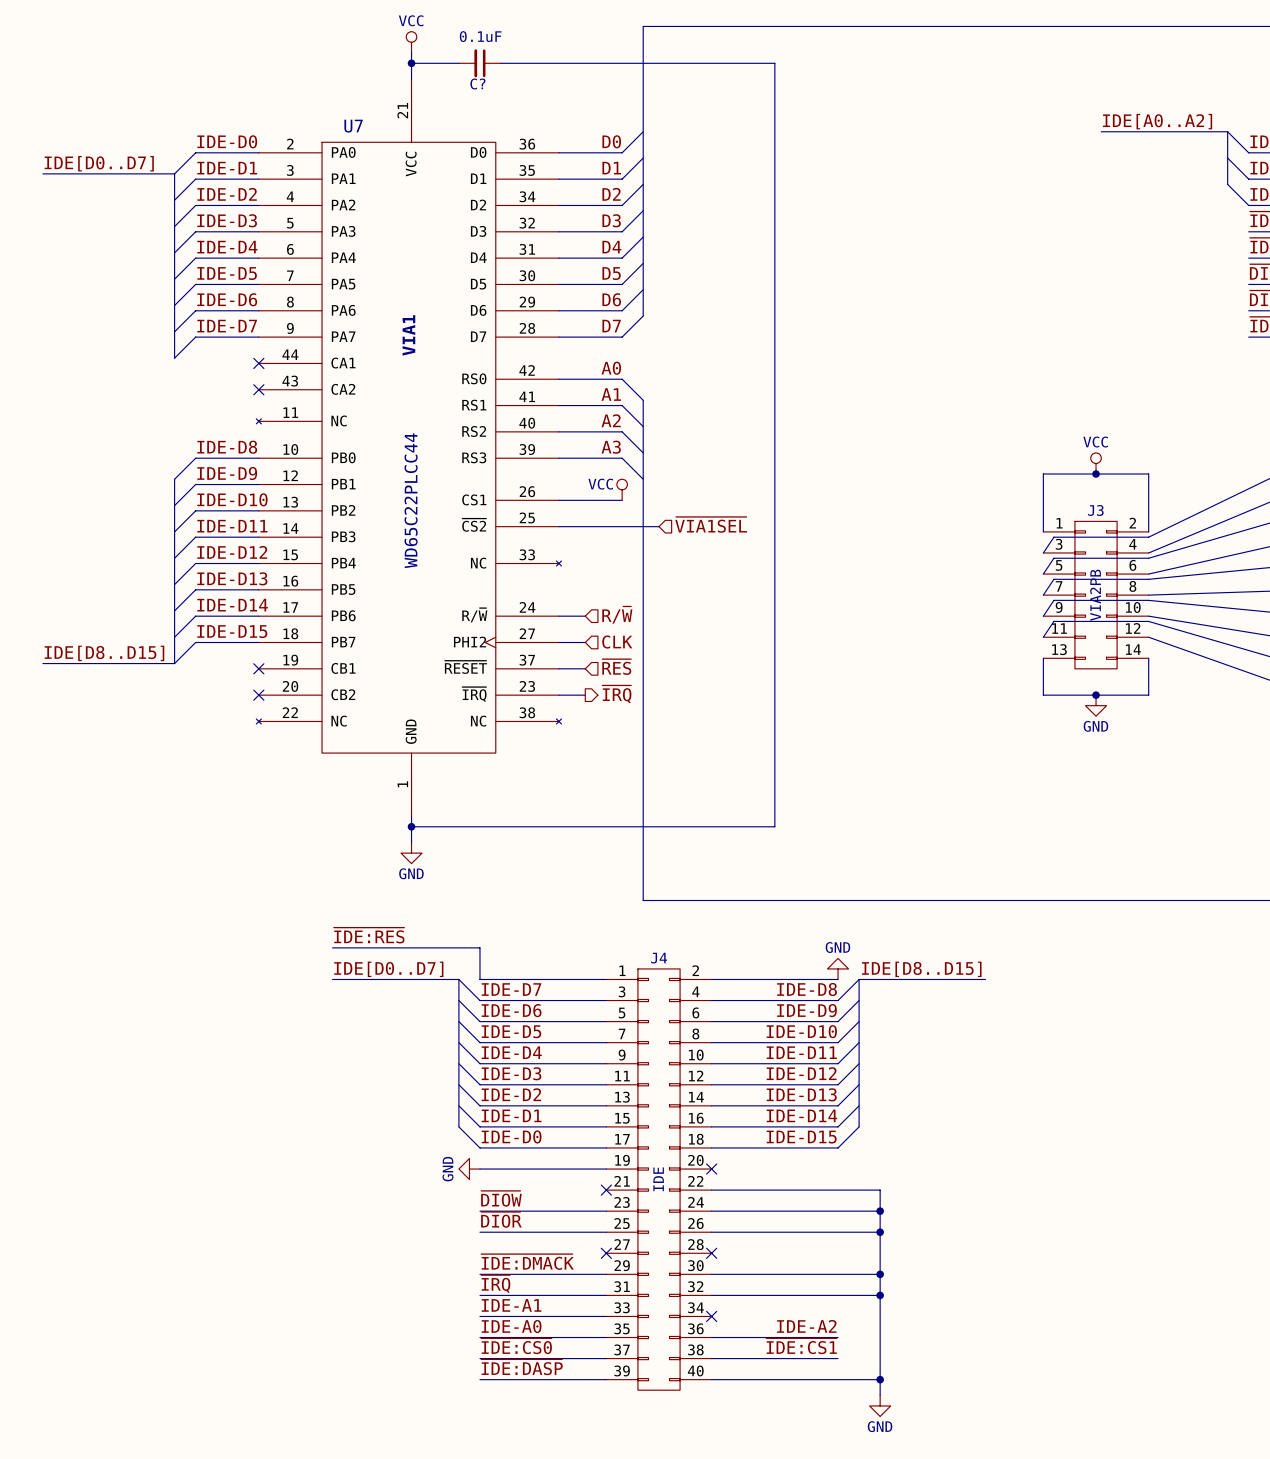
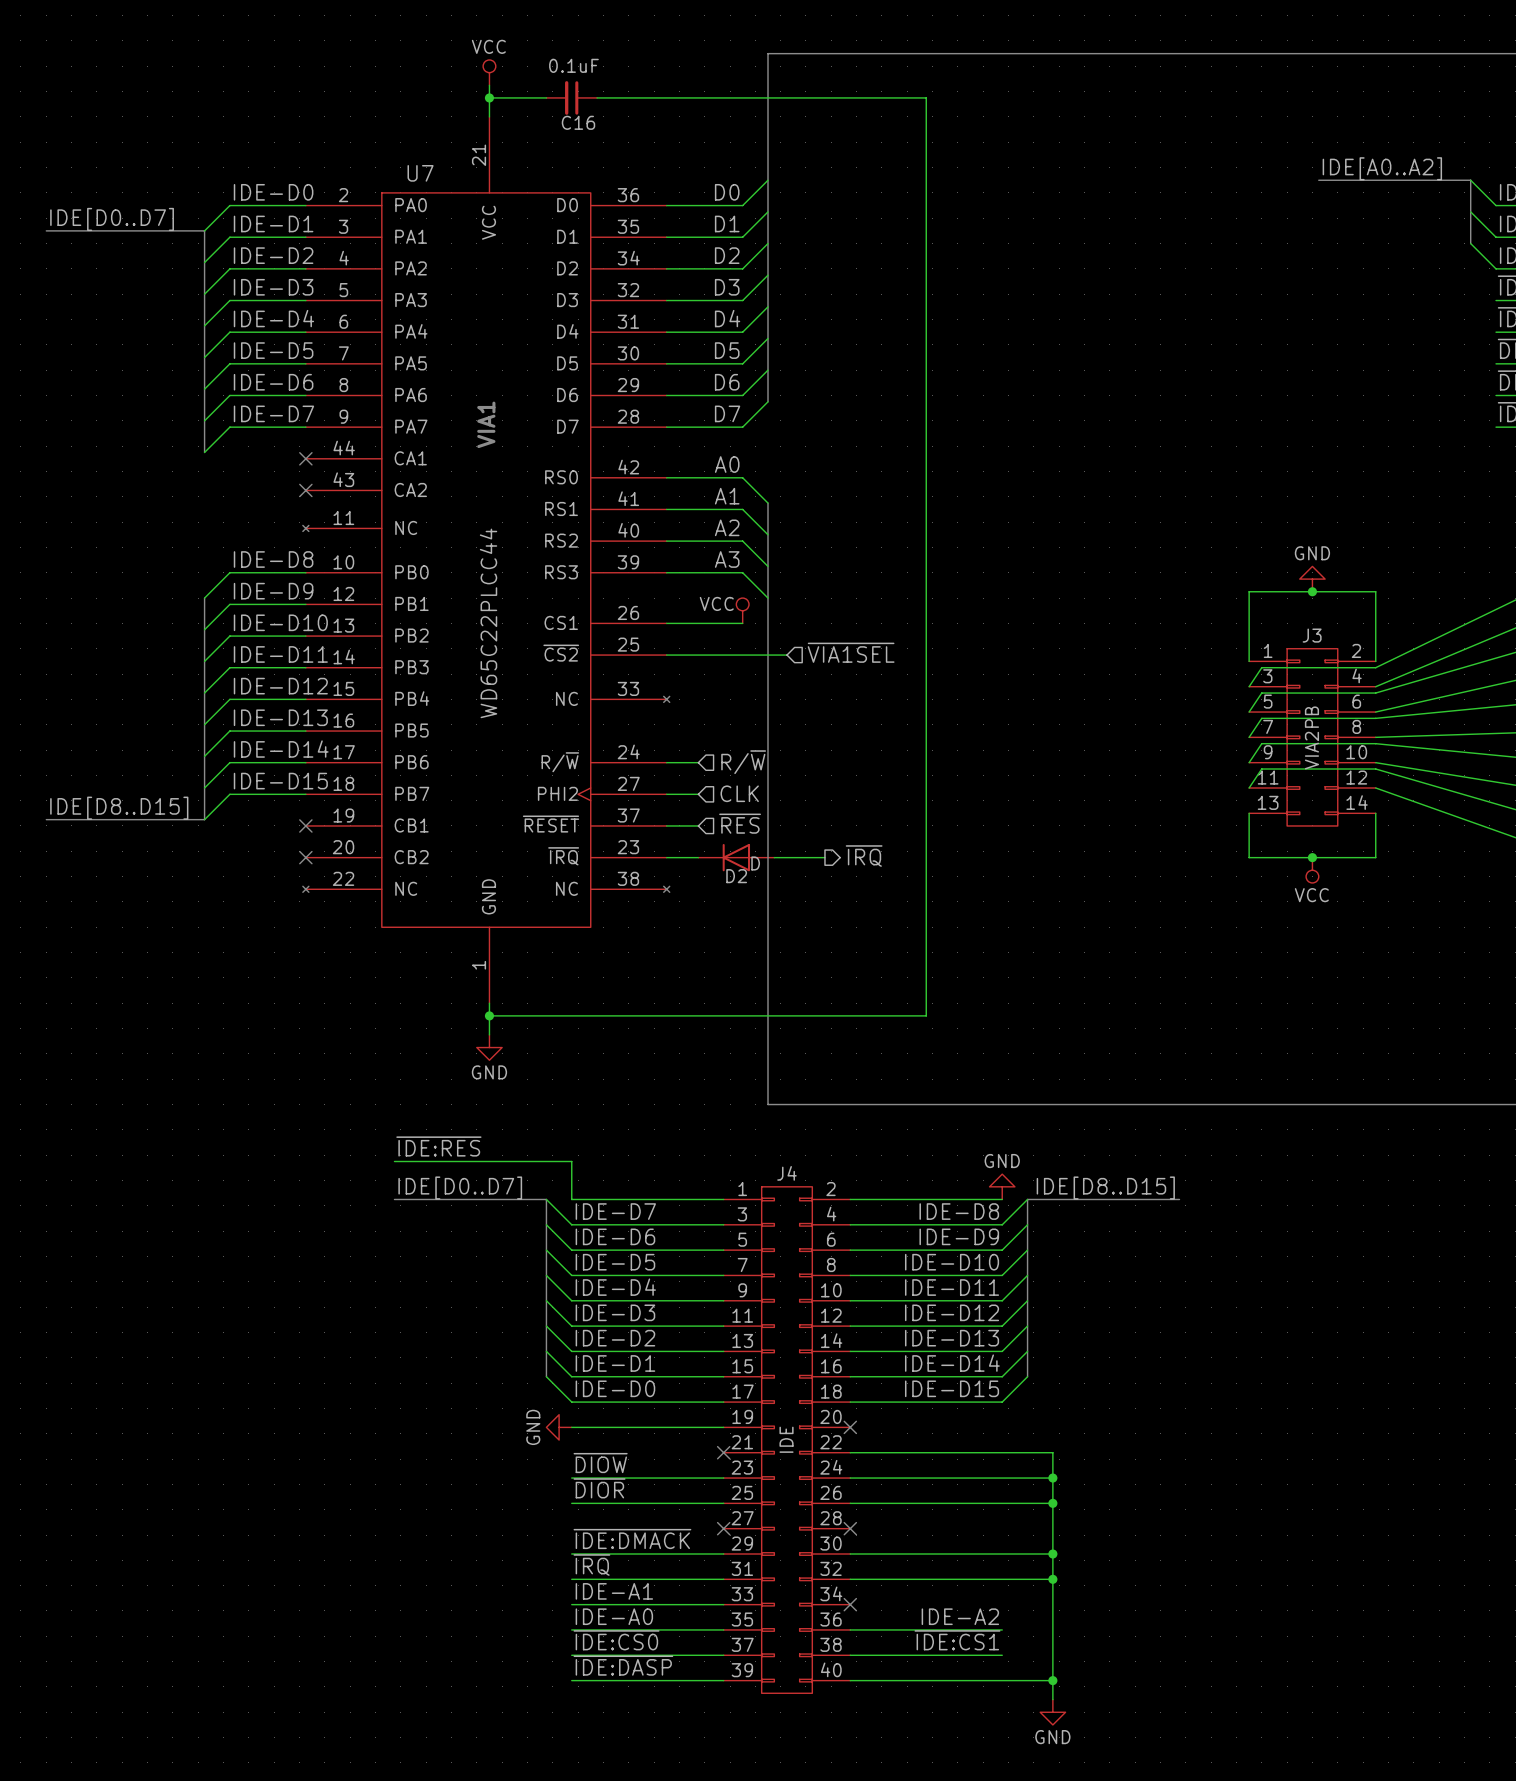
C? name: C? (477, 83) -> C16 (578, 122)
power symbol: VCC (1096, 463) -> GND (1312, 579)
hierarchical label position: ~{IRQ} (616, 694) -> ~{IRQ} (864, 856)
D2: none -> D (736, 857)
wire: none -> (774, 857) (824, 857)
power symbol: GND (1096, 705) -> VCC (1312, 870)

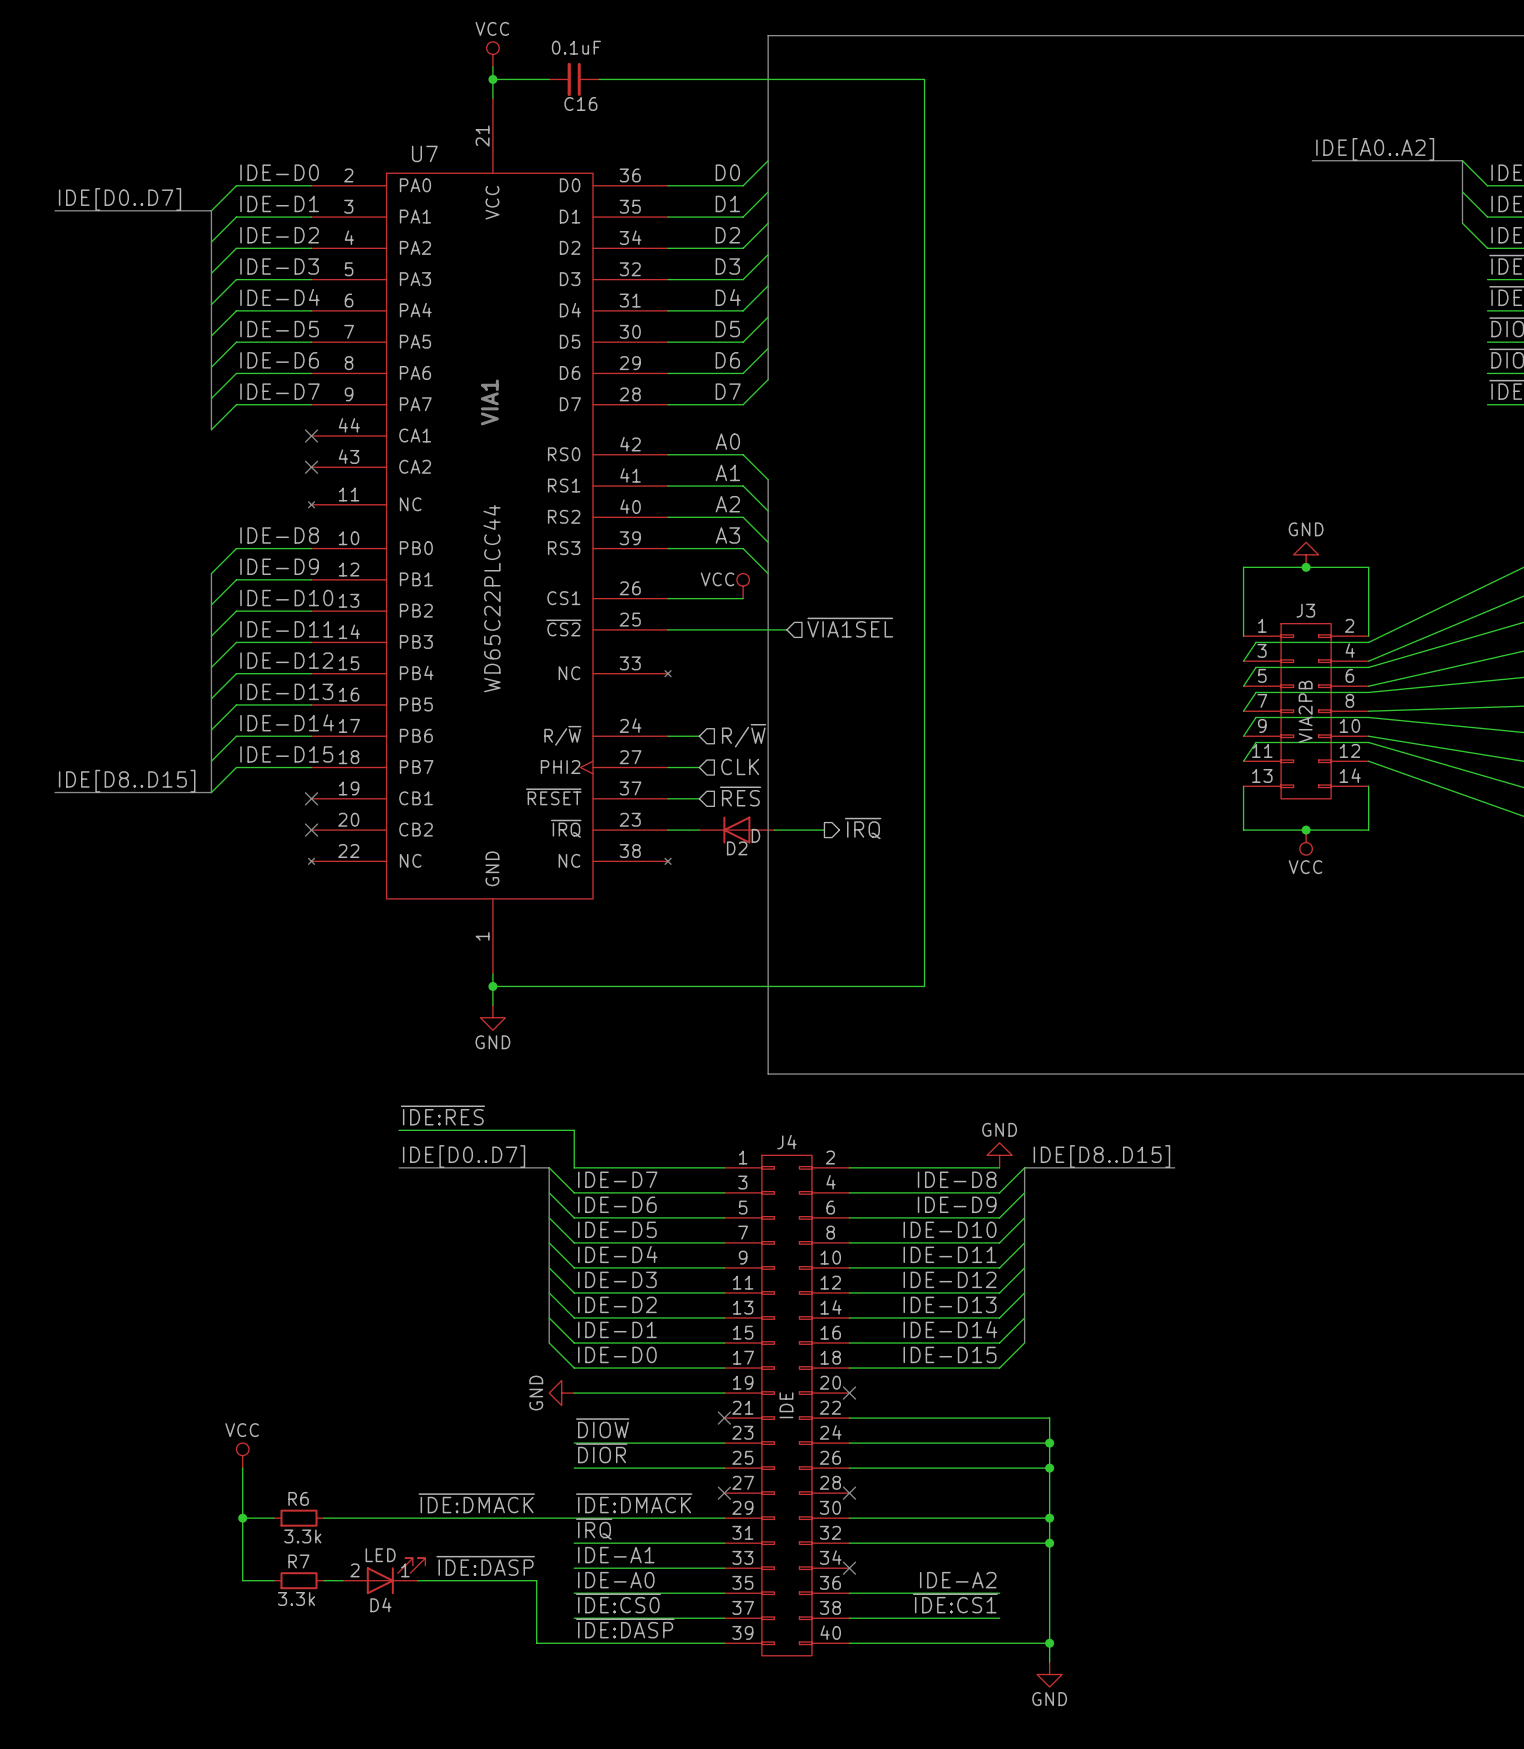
power symbol: none -> VCC (242, 1455)
wire: none -> (242, 1468) (242, 1580) (273, 1580)
label: none -> ~{IDE:DMACK} (476, 1503)
wire: none -> (242, 1518) (273, 1518)
junction: none -> (242, 1518)
R6: none -> 3.3k (299, 1518)
wire: none -> (324, 1518) (574, 1518)
label: none -> ~{IDE:DASP} (485, 1565)
D4: none -> LED (384, 1576)
R7: none -> 3.3k (299, 1580)
wire: none -> (324, 1580) (342, 1580)
wire: none -> (417, 1580) (536, 1580) (536, 1643) (574, 1643)

